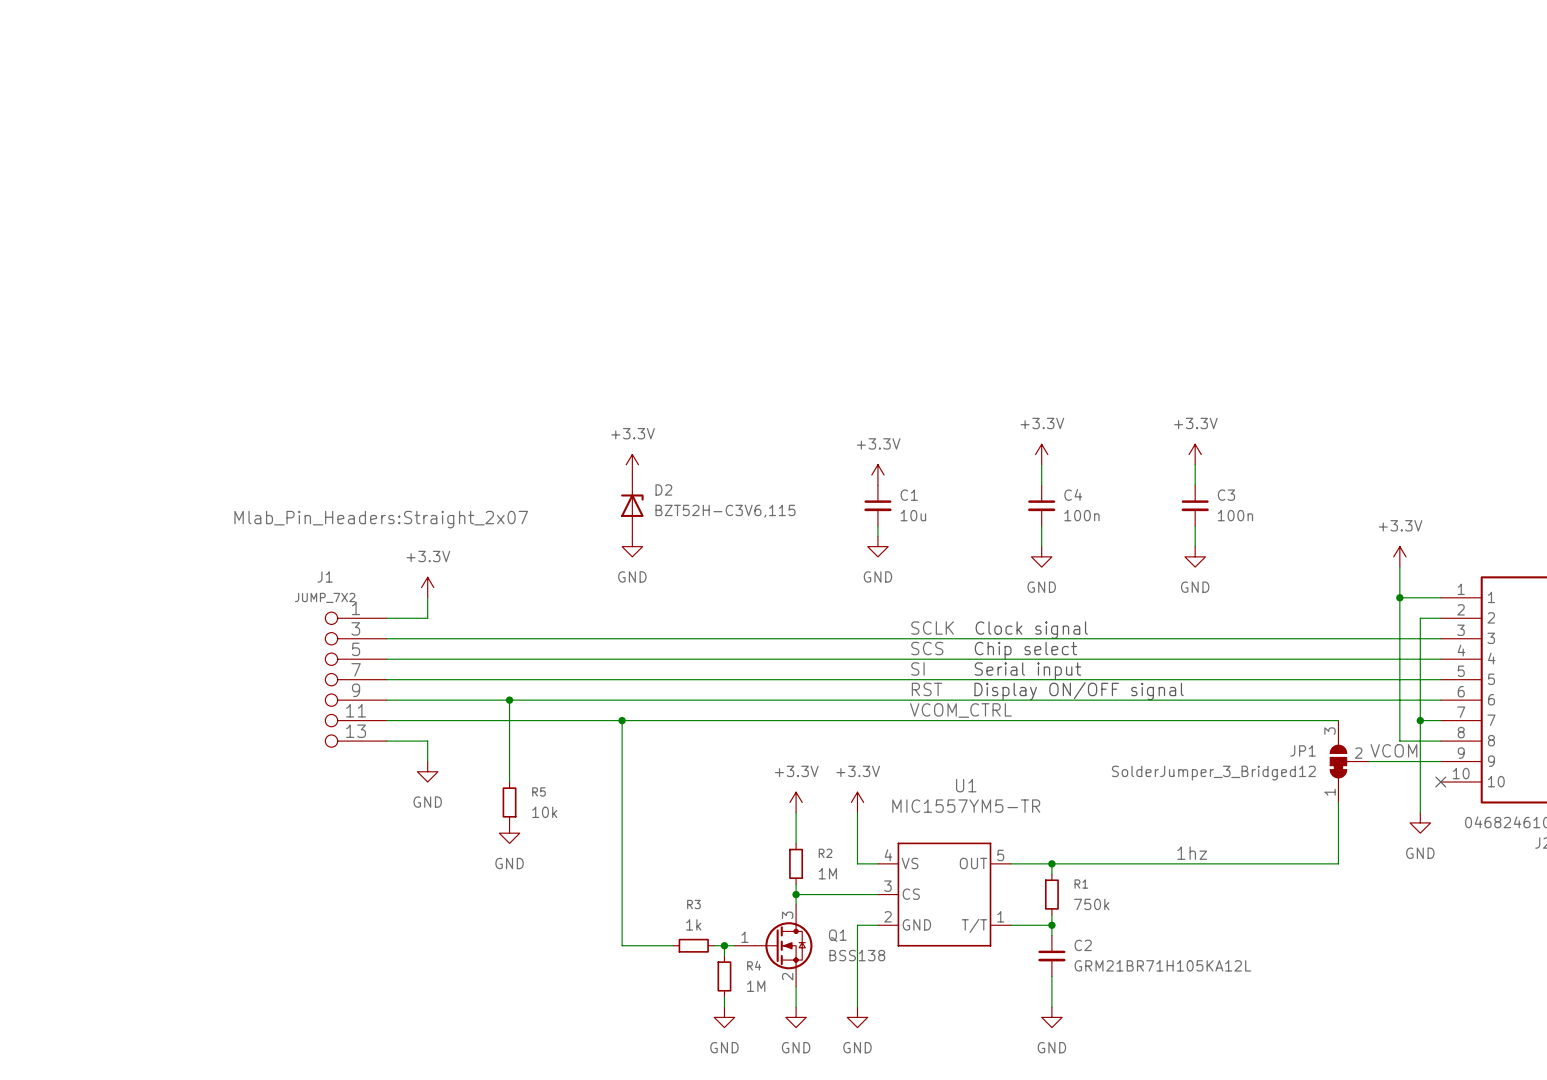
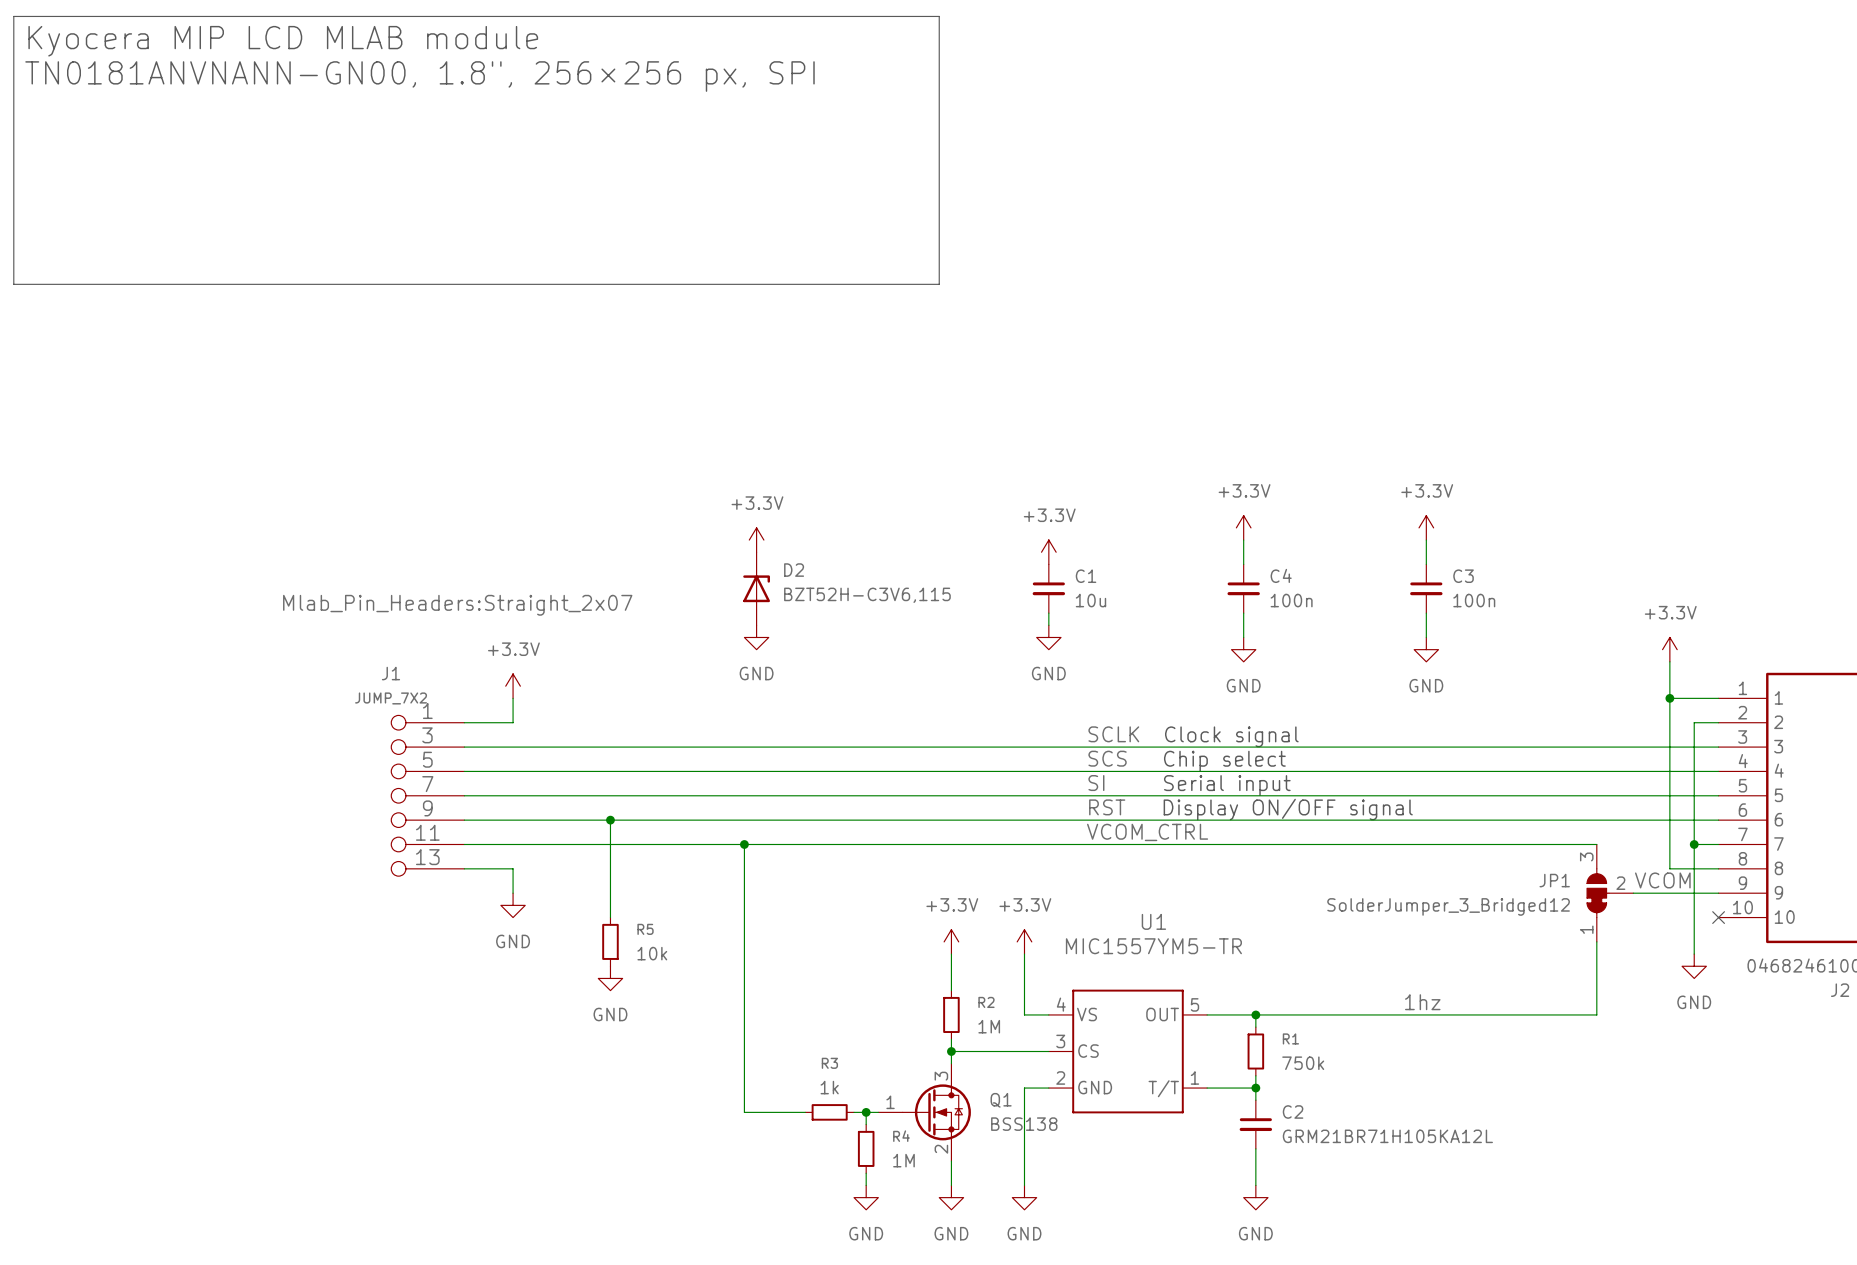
line: none -> (13, 16) (939, 16) (939, 284) (13, 284) (13, 16)
text: none -> Kyocera MIP LCD MLAB module (283, 41)
text: none -> TN0181ANVNANN-GN00, 1.8", 256×256 px, SPI (419, 76)

